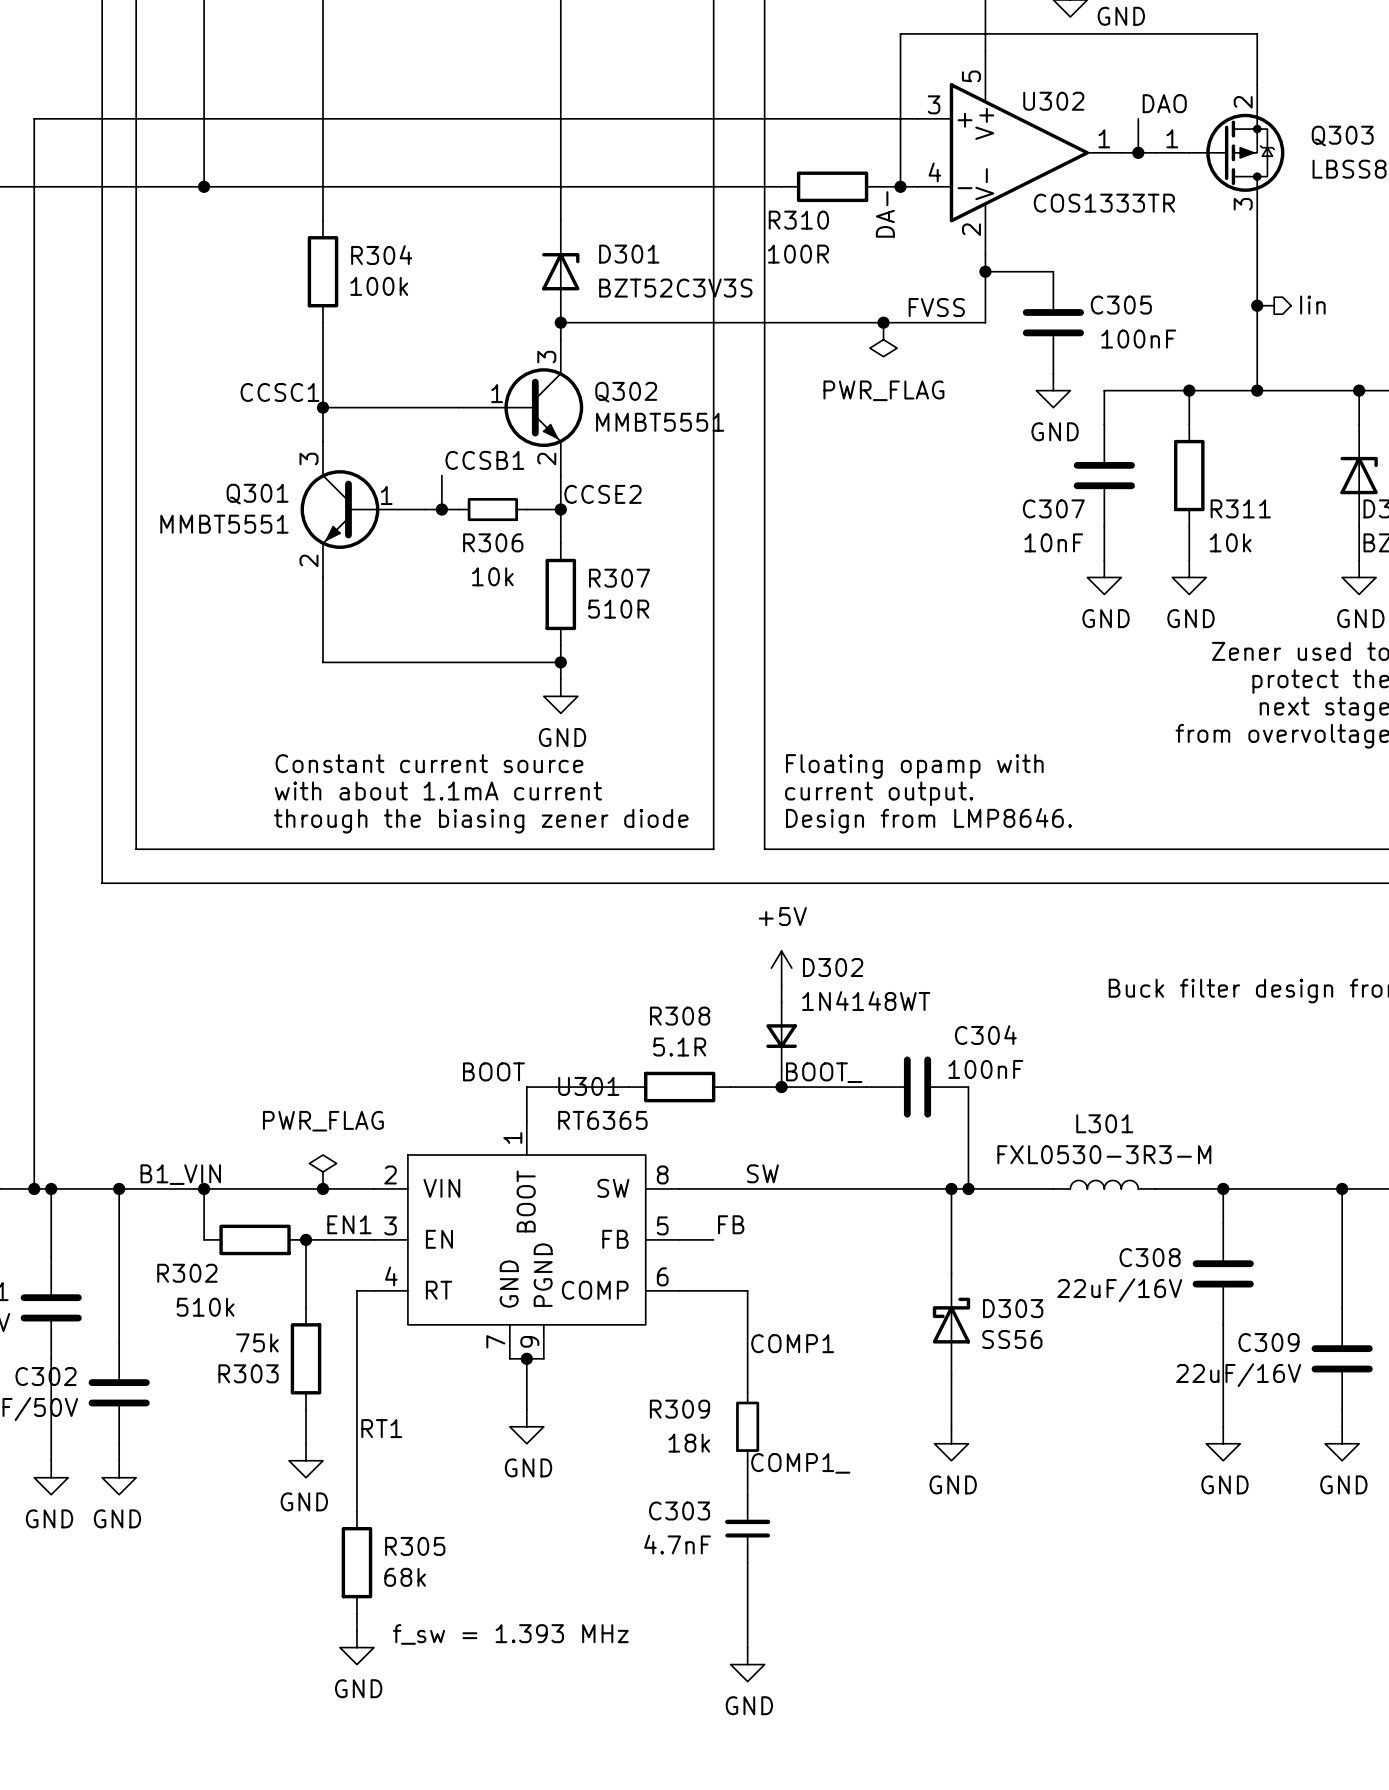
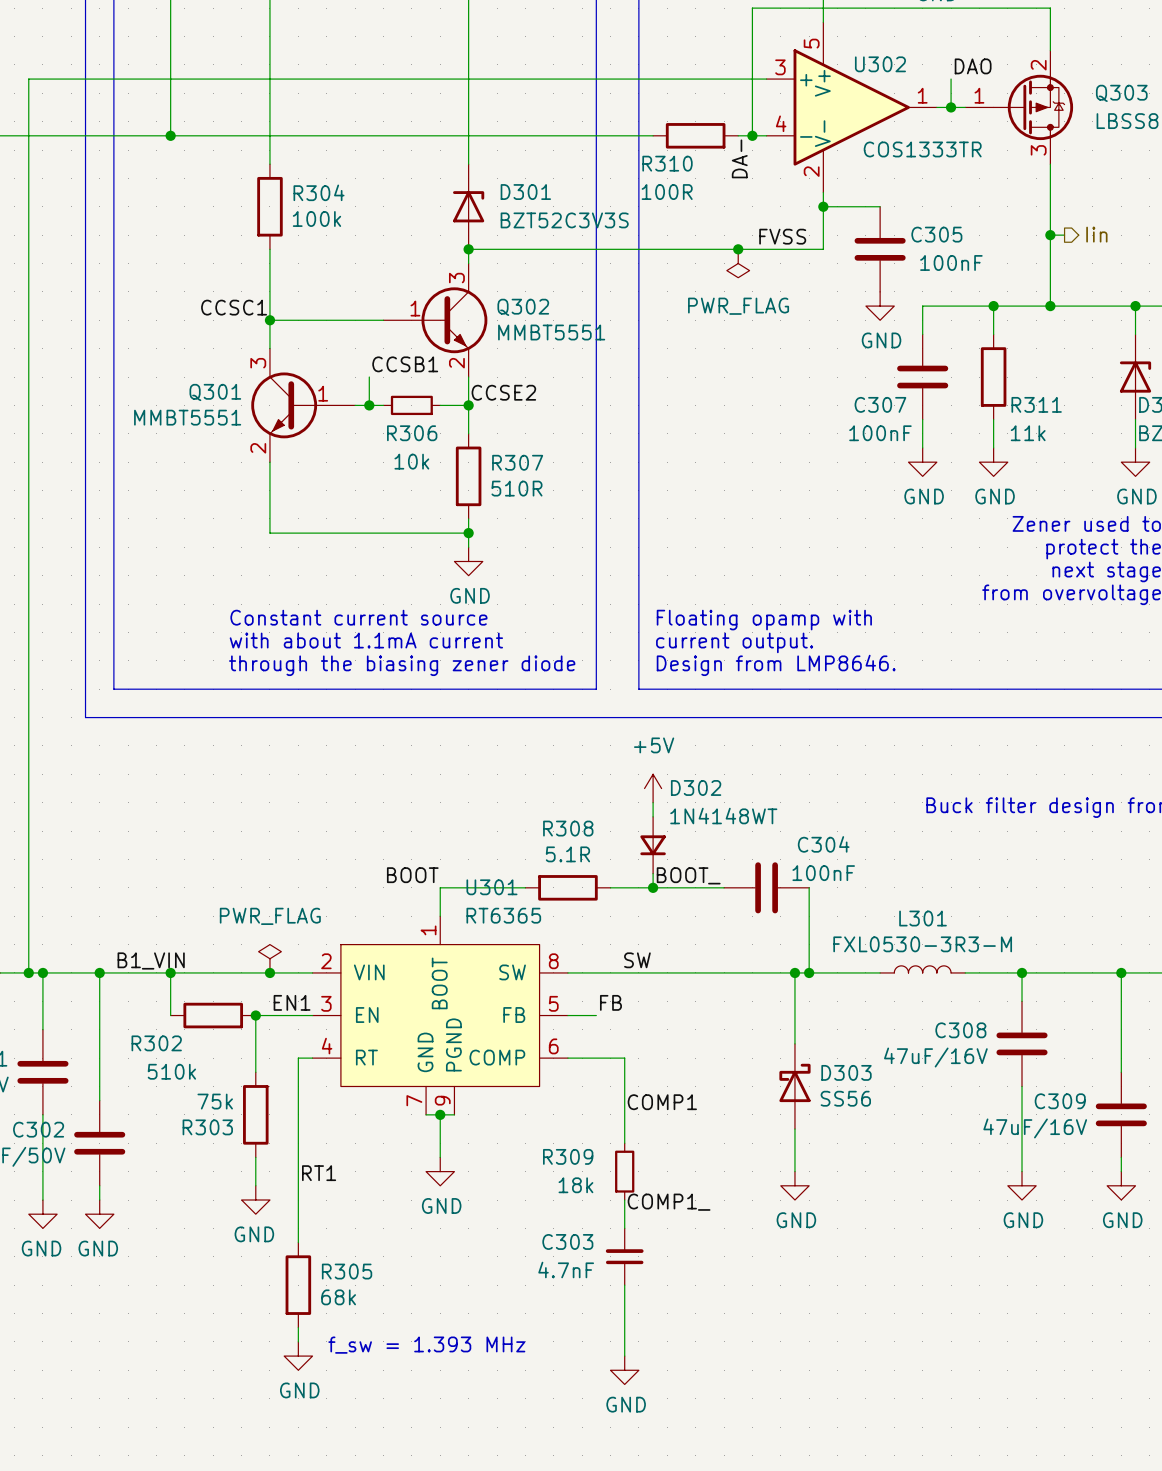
C307 value: 10nF (1053, 542) -> 100nF (880, 433)
R311 value: 10k (1230, 542) -> 11k (1028, 433)
C308 value: 22uF/16V (1119, 1290) -> 47uF/16V (935, 1057)
C309 value: 22uF/16V (1238, 1375) -> 47uF/16V (1035, 1128)

